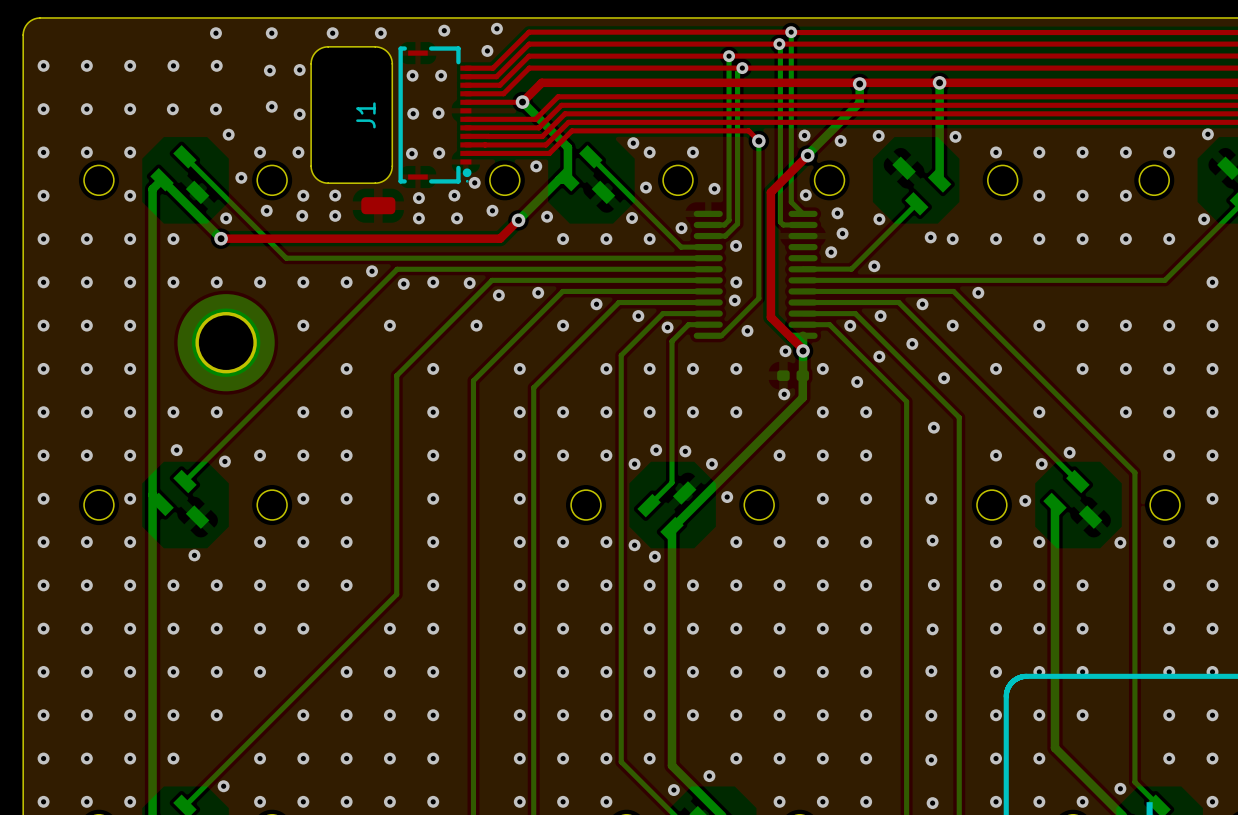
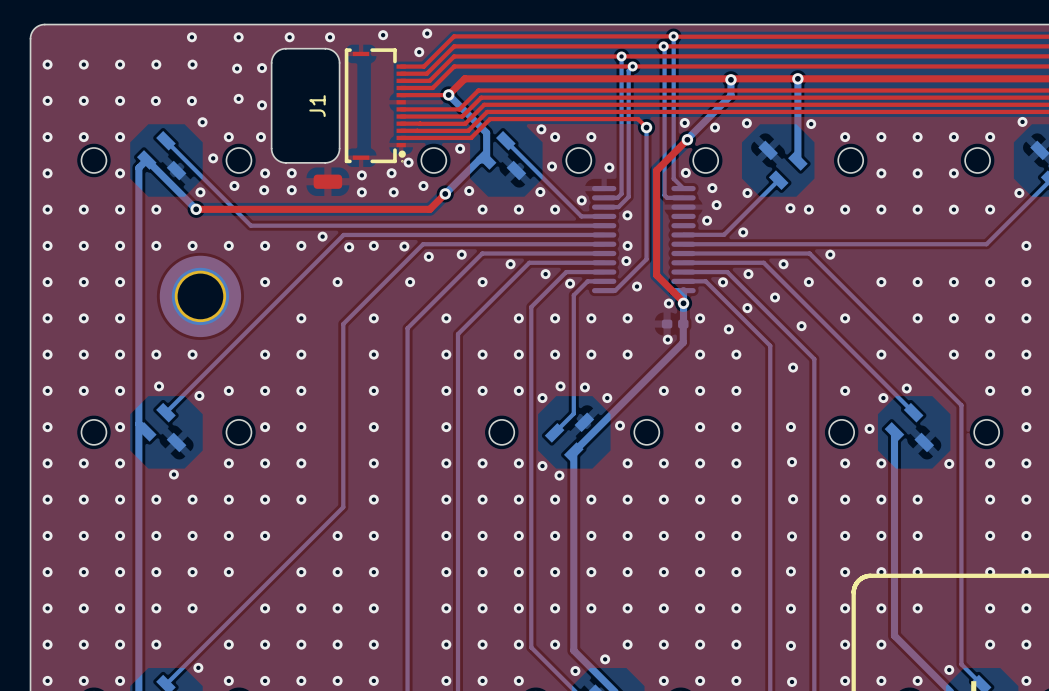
via: (412, 75) -> none
via: (441, 75) -> none
via: (413, 113) -> none
via: (438, 113) -> none
via: (411, 153) -> none
via: (439, 153) -> none

